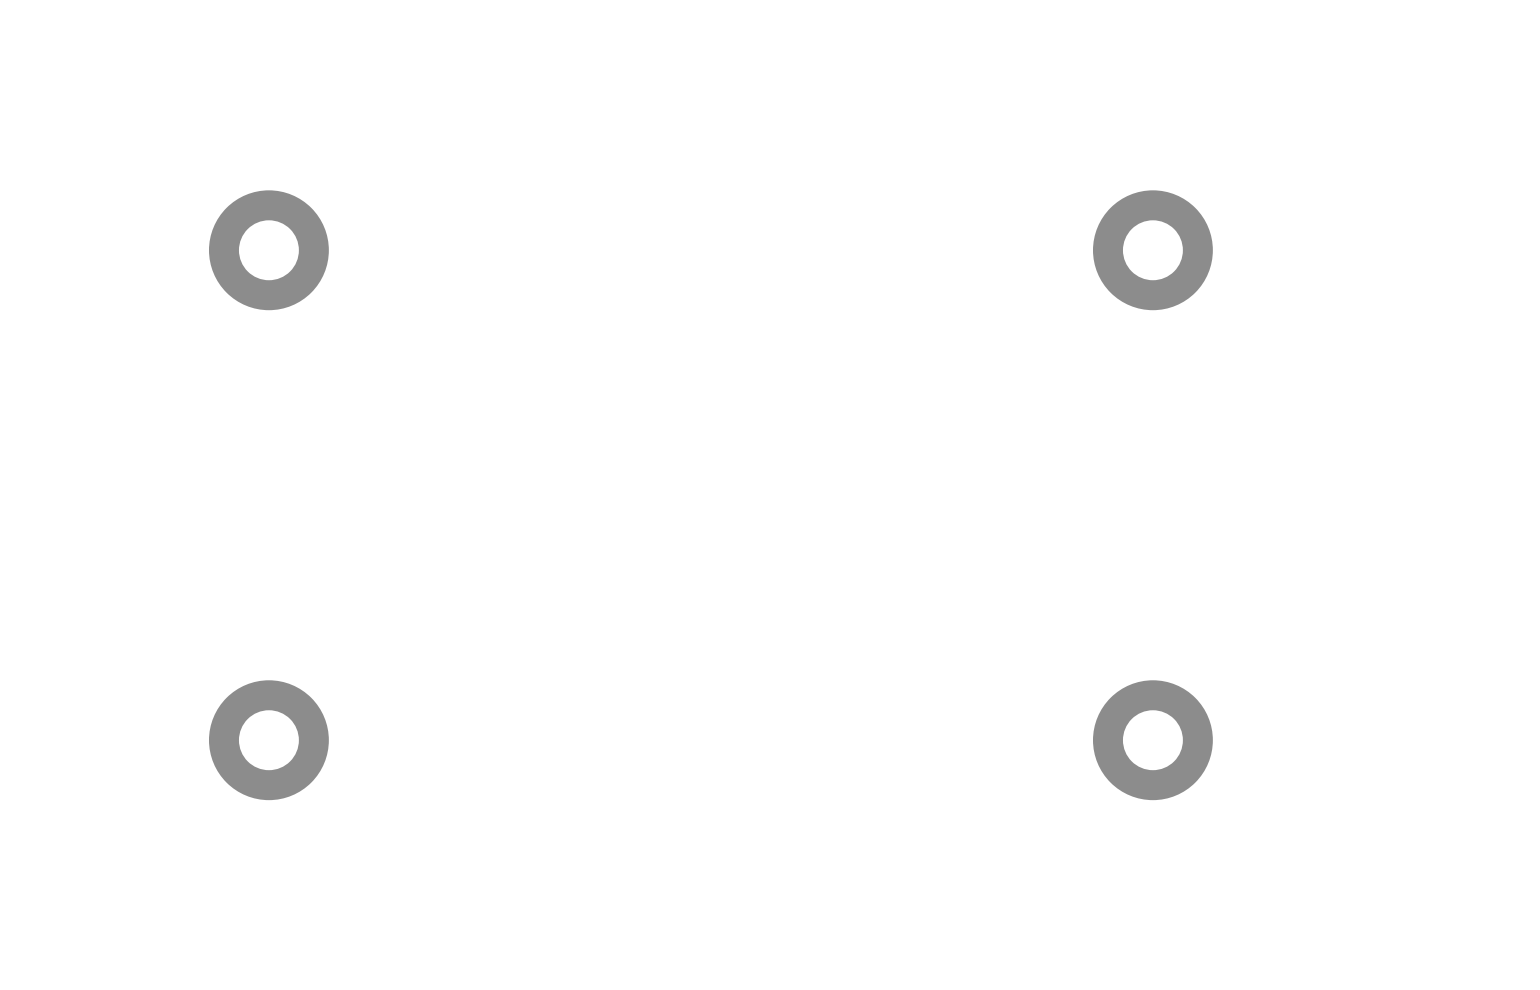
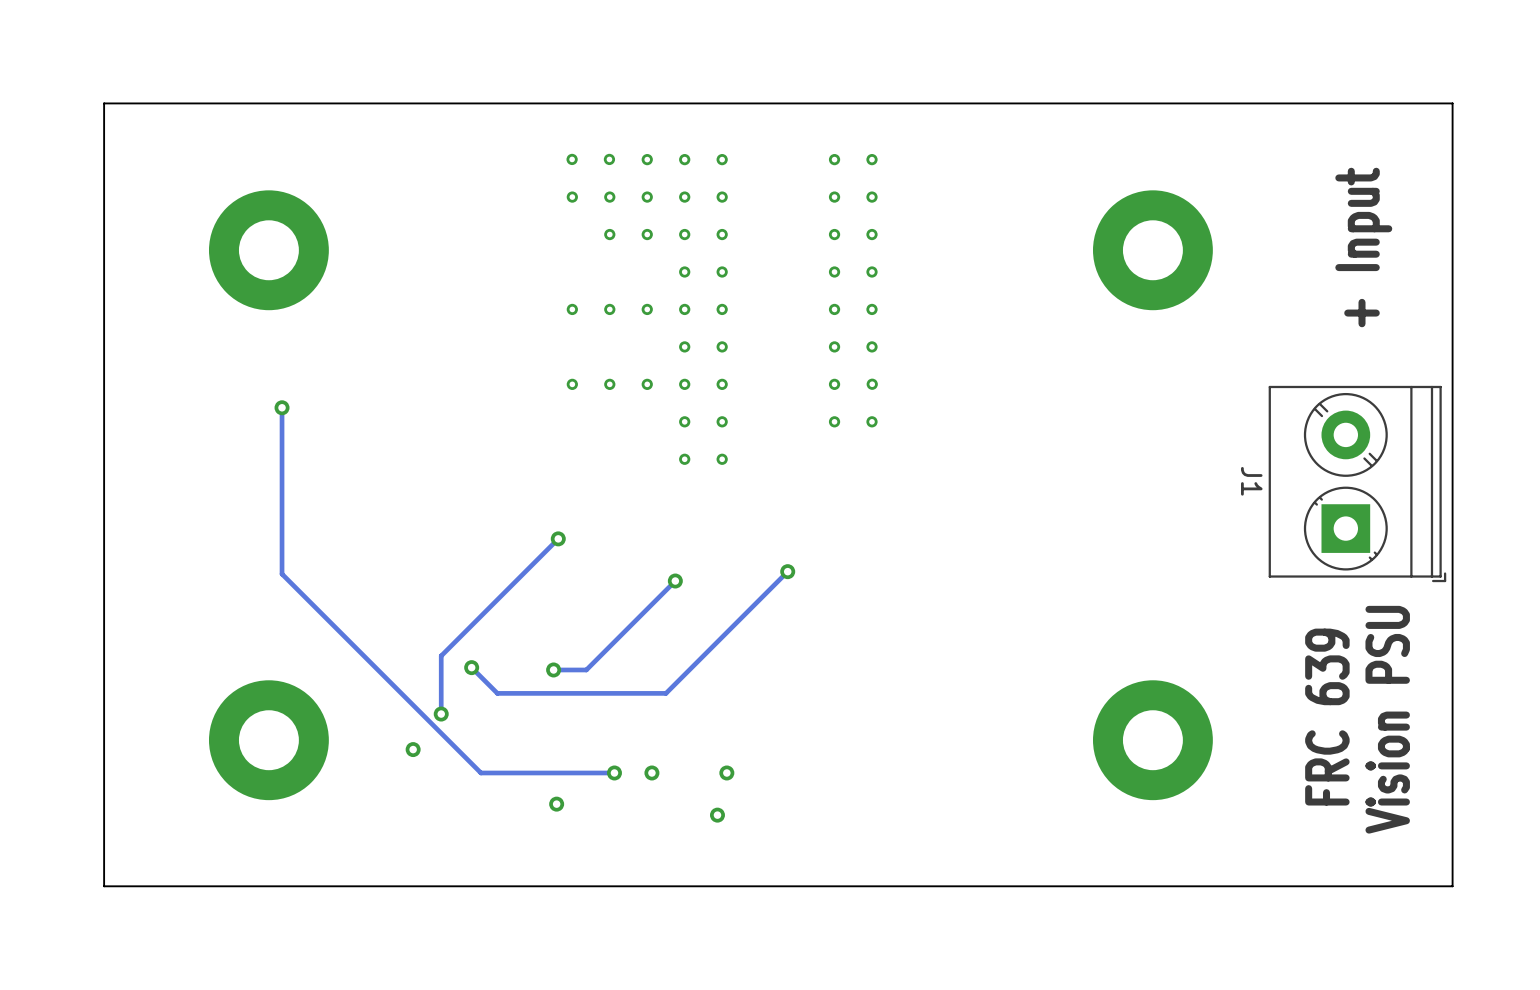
board edge: none -> (1452, 103) (104, 103) (104, 886) (1452, 886) (1452, 103)
via: none -> (572, 159)
via: none -> (609, 159)
via: none -> (647, 159)
via: none -> (684, 159)
via: none -> (722, 159)
via: none -> (834, 159)
via: none -> (871, 159)
via: none -> (572, 197)
via: none -> (609, 197)
via: none -> (647, 197)
via: none -> (684, 197)
via: none -> (722, 197)
via: none -> (834, 197)
via: none -> (871, 197)
via: none -> (609, 234)
via: none -> (647, 234)
via: none -> (684, 234)
via: none -> (722, 234)
via: none -> (834, 234)
via: none -> (871, 234)
text: none -> + Input (1363, 247)
via: none -> (684, 271)
via: none -> (722, 271)
via: none -> (834, 271)
via: none -> (871, 271)
via: none -> (572, 309)
via: none -> (609, 309)
via: none -> (647, 309)
via: none -> (684, 309)
via: none -> (722, 309)
via: none -> (834, 309)
via: none -> (871, 309)
via: none -> (684, 346)
via: none -> (722, 346)
via: none -> (834, 346)
via: none -> (871, 346)
via: none -> (572, 384)
via: none -> (609, 384)
via: none -> (647, 384)
via: none -> (684, 384)
via: none -> (722, 384)
via: none -> (834, 384)
via: none -> (872, 384)
track: none -> (282, 407) (282, 574) (480, 772) (614, 772)
via: none -> (282, 407)
via: none -> (684, 421)
via: none -> (722, 421)
via: none -> (834, 421)
via: none -> (871, 421)
via: none -> (684, 459)
via: none -> (722, 459)
J1: none -> (1357, 484)
track: none -> (558, 538) (441, 655) (441, 714)
via: none -> (558, 538)
track: none -> (787, 571) (665, 693) (497, 693) (471, 667)
via: none -> (787, 571)
track: none -> (675, 581) (586, 669) (553, 669)
via: none -> (675, 581)
via: none -> (471, 667)
via: none -> (553, 669)
via: none -> (441, 714)
text: none -> FRC 639 (1327, 717)
text: none -> Vision PSU (1387, 719)
via: none -> (413, 749)
via: none -> (614, 772)
via: none -> (651, 772)
via: none -> (726, 772)
via: none -> (556, 804)
via: none -> (717, 815)

